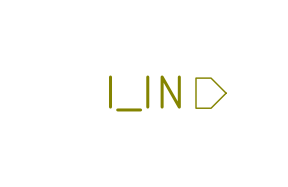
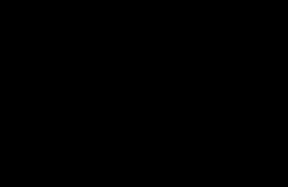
hierarchical label: I_IN (144, 93) -> none

